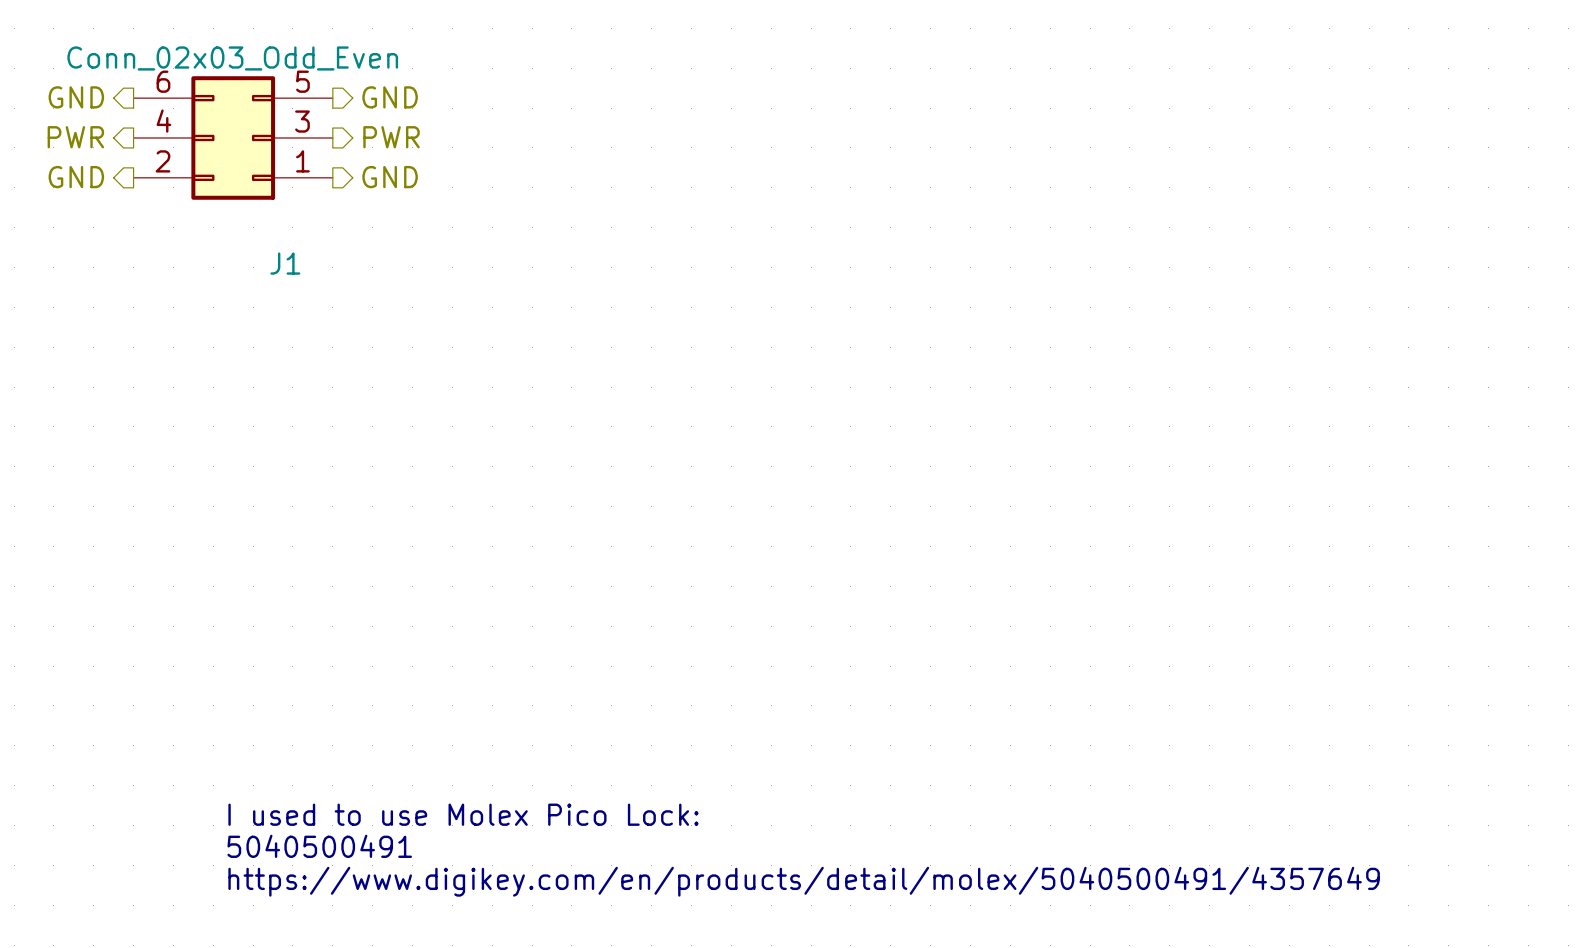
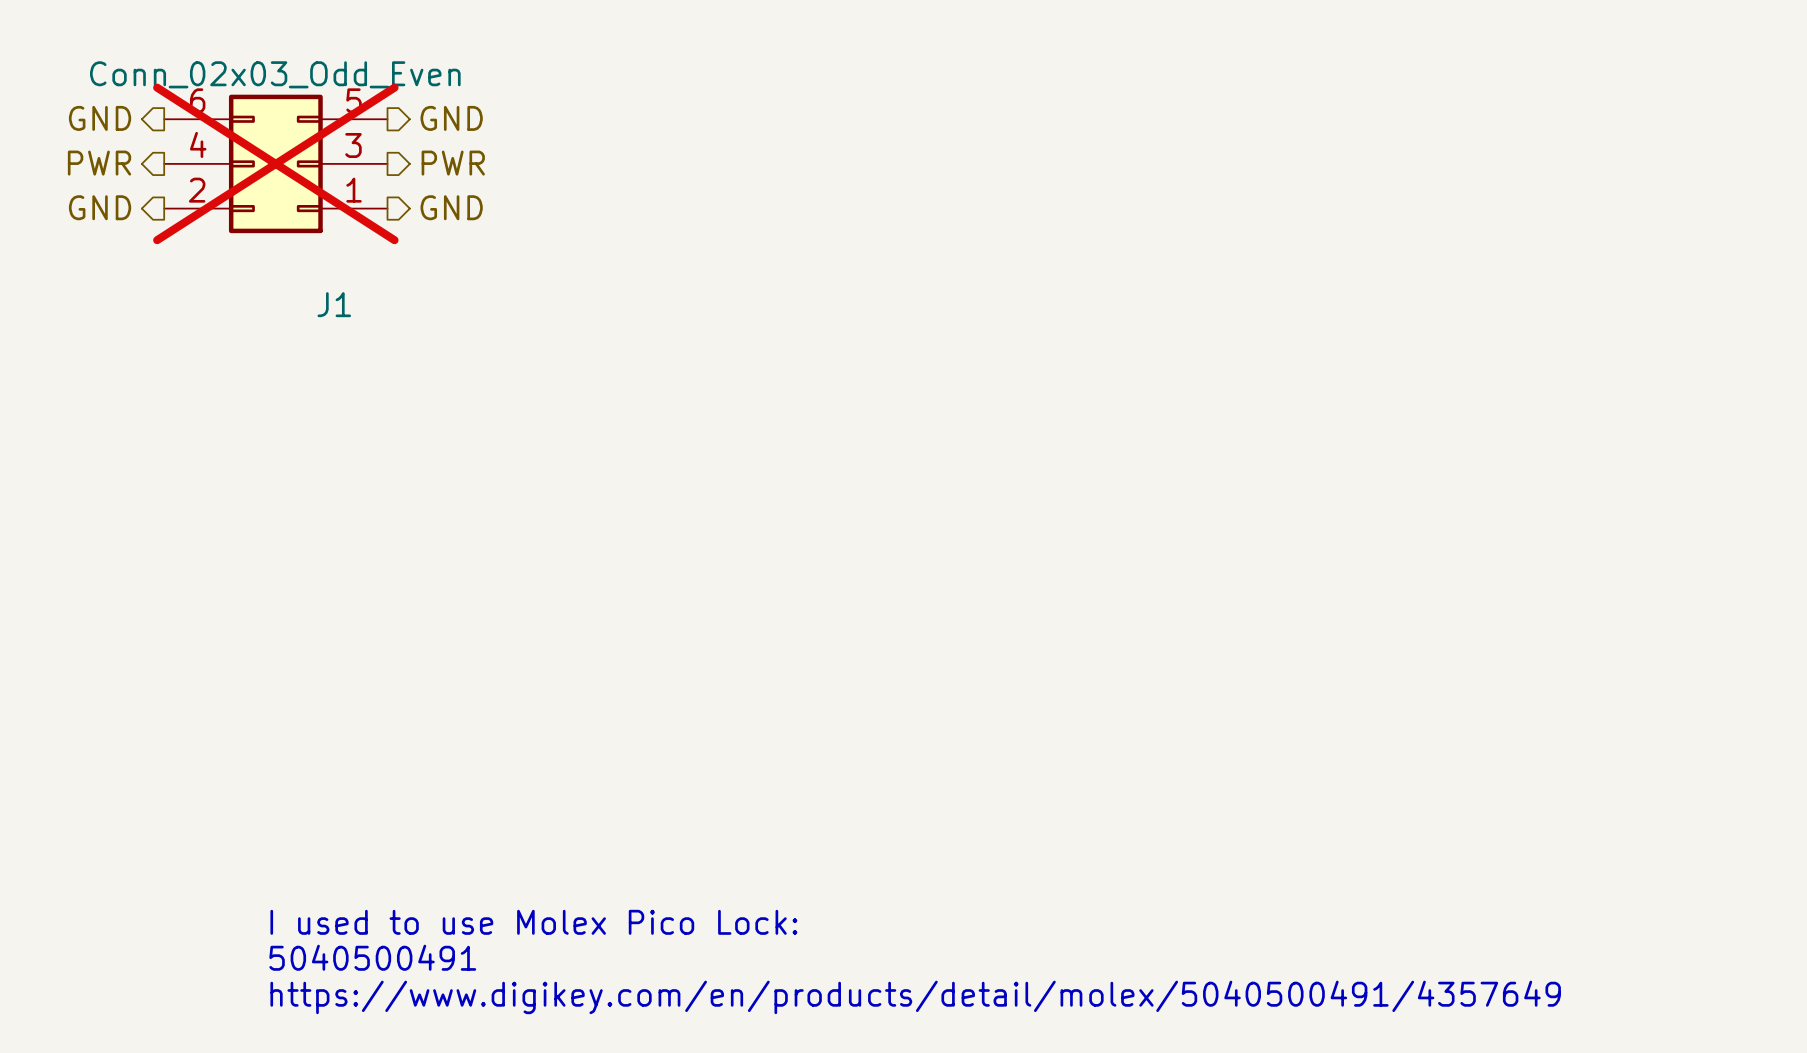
J1 do-not-place cross: none -> (275, 163)

